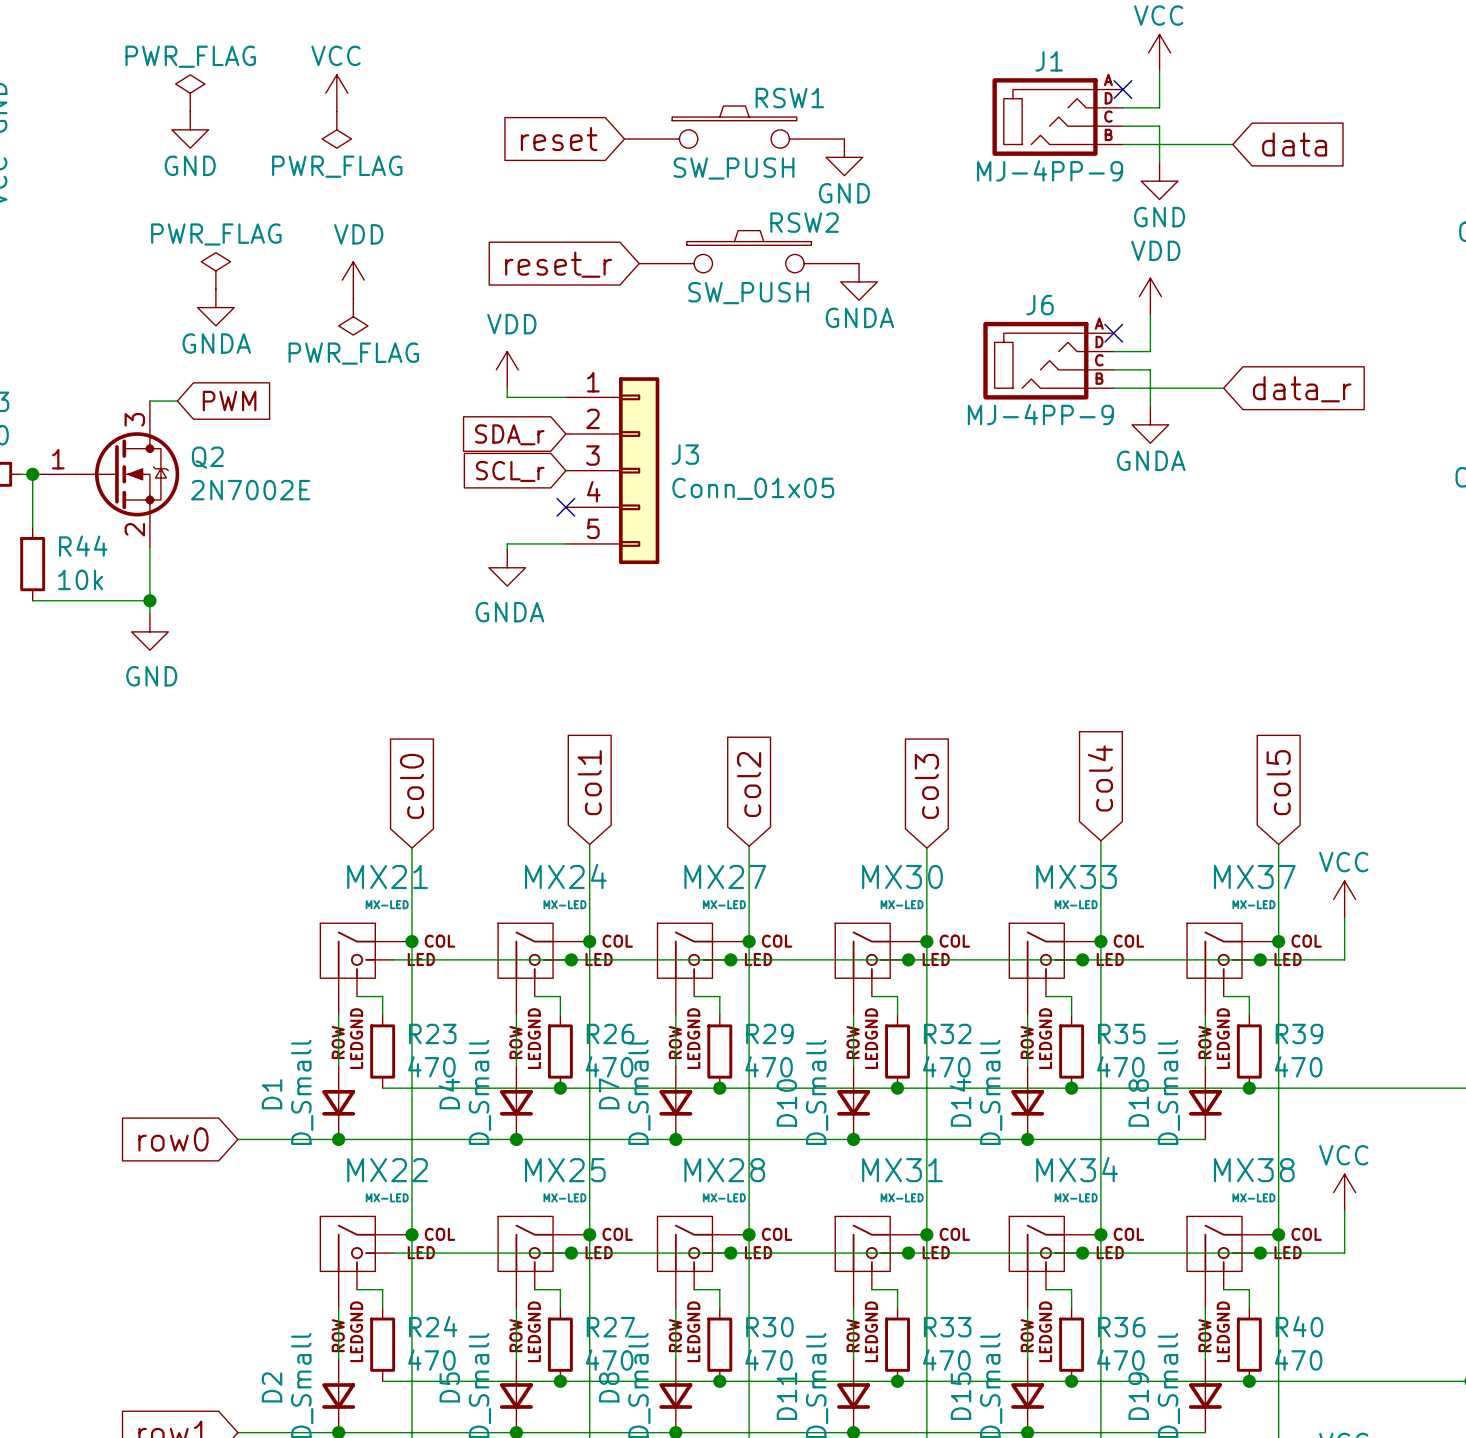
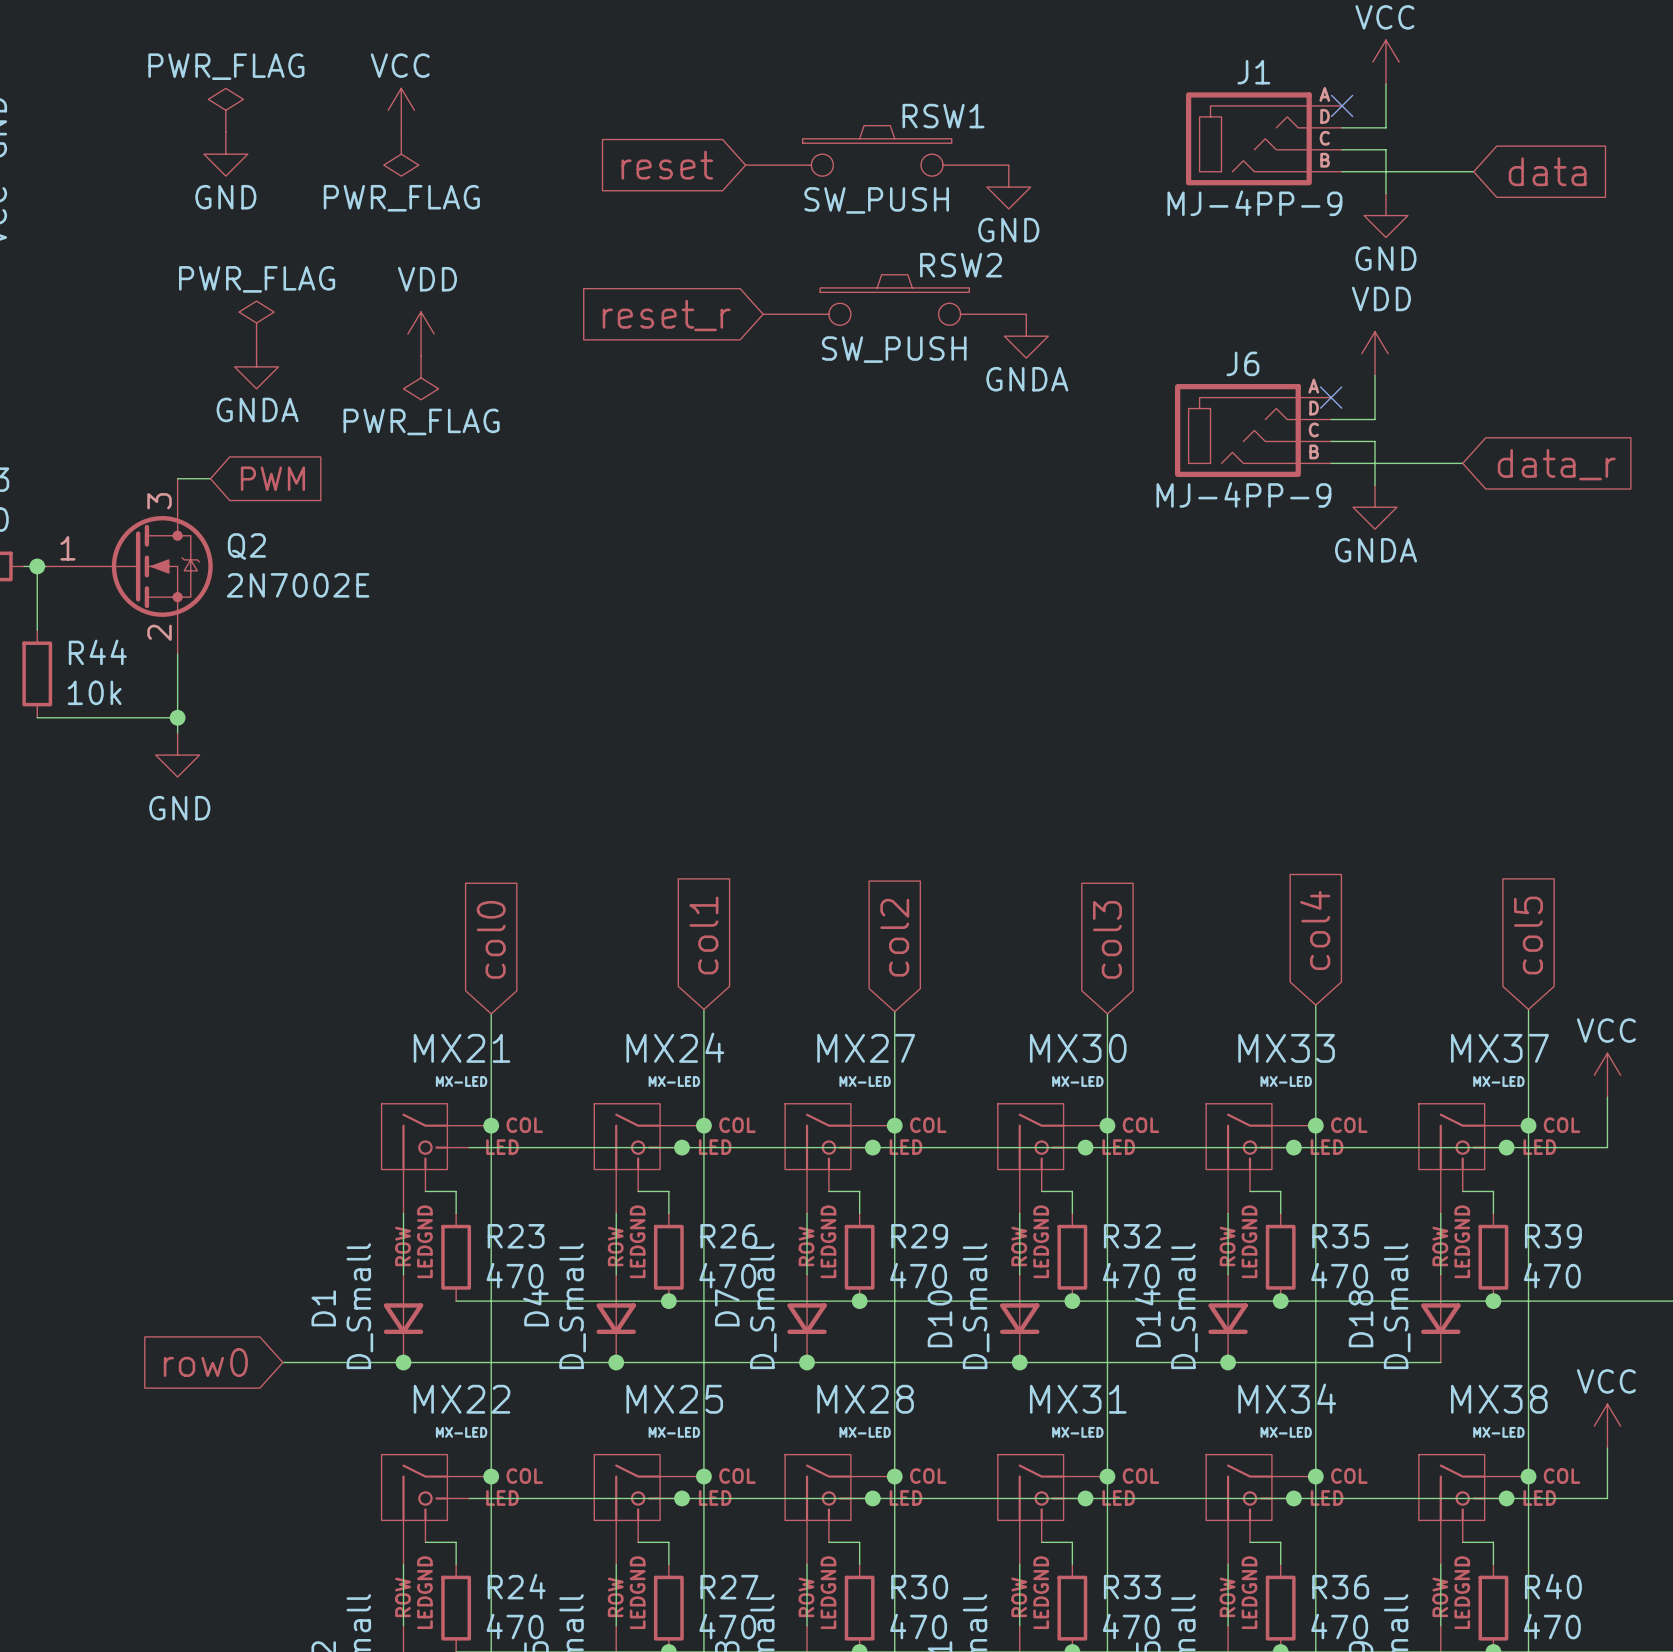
power symbol: VDD (507, 369) -> none
wire: (507, 388) (507, 397) (565, 397) -> none
global label: SDA_r (509, 434) -> none
J3: Conn_01x05 (612, 470) -> none
global label: SCL_r (510, 471) -> none
no-connect mark: (565, 507) -> none
wire: (565, 543) (507, 543) (507, 549) -> none
power symbol: GNDA (507, 567) -> none

